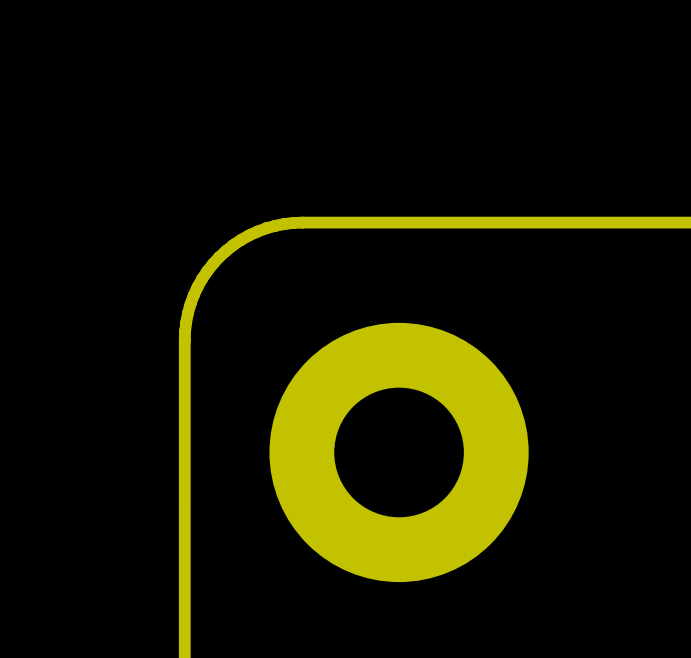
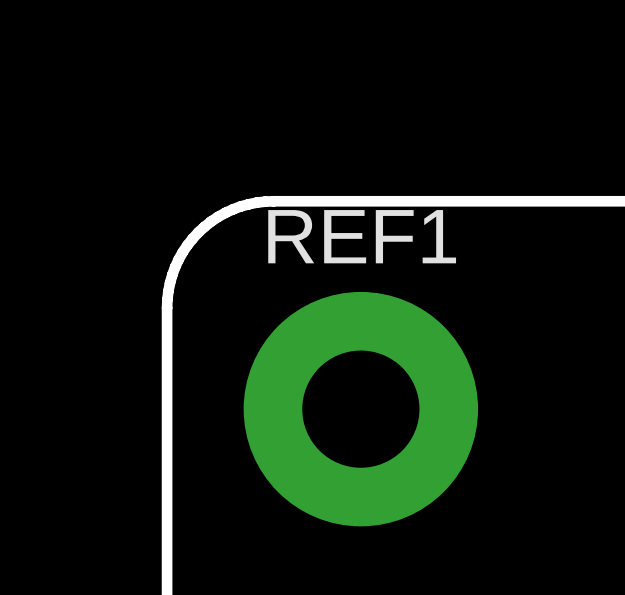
REF1 name: none -> REF1 (362, 236)

